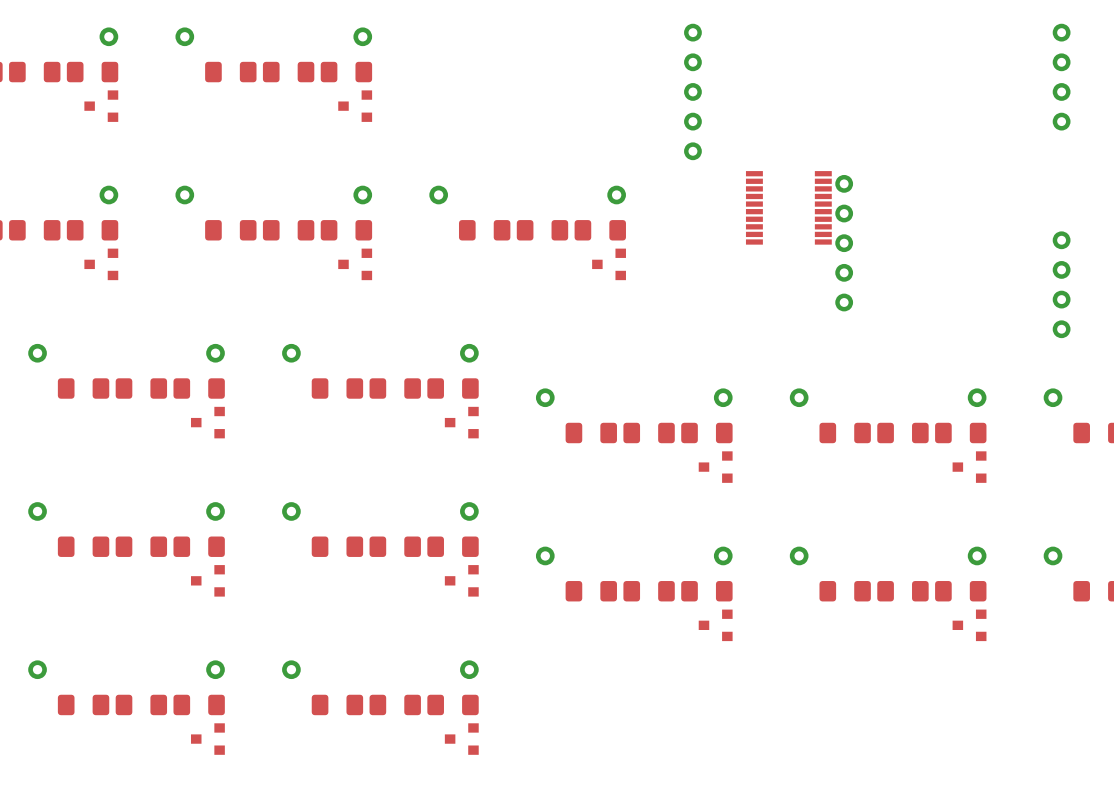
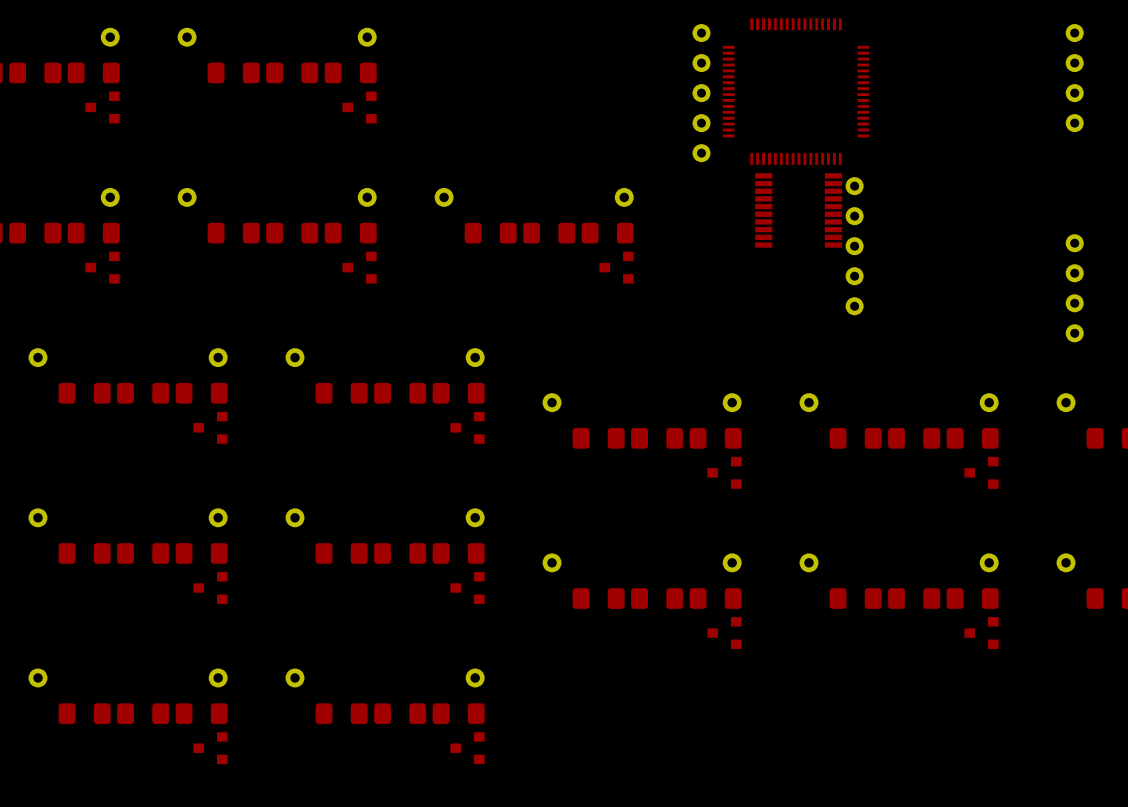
part: none -> (796, 91)

